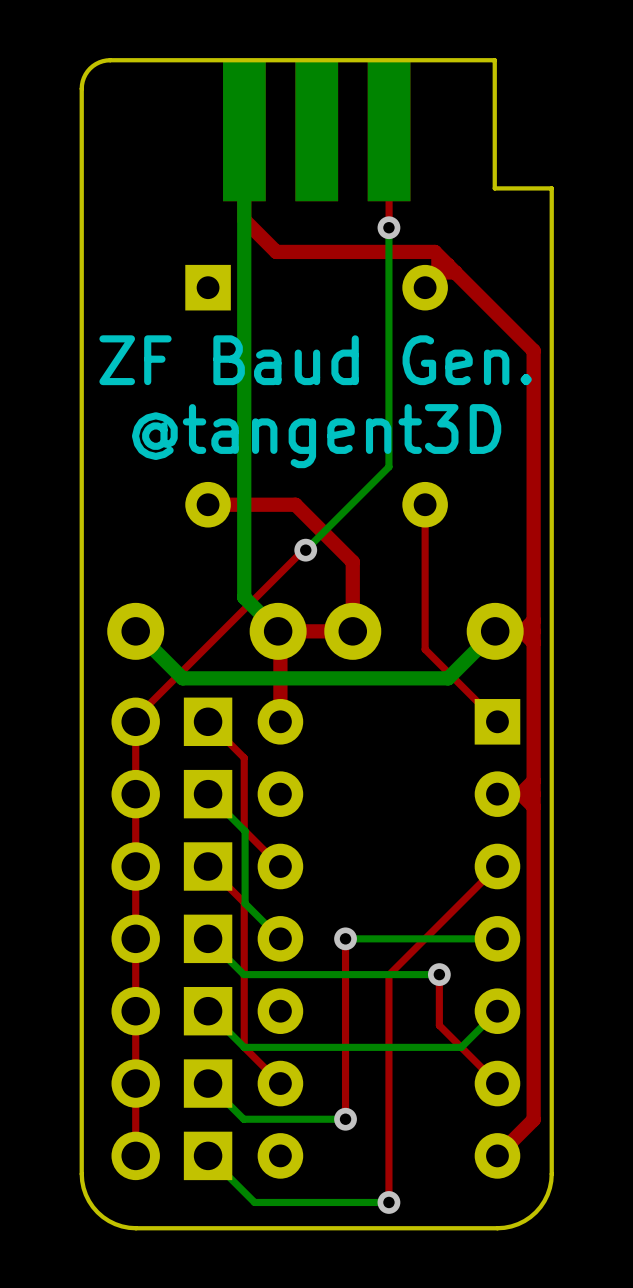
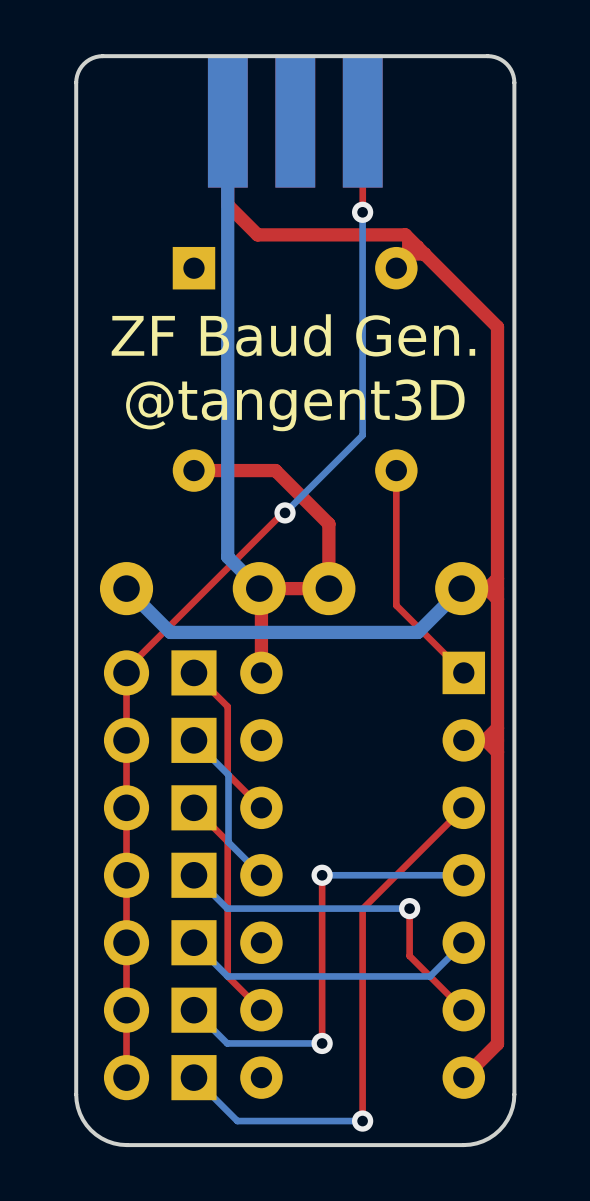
board edge: (494, 60) (494, 188) (551, 188) -> (461, 56) (494, 57) (506, 63) (512, 72) (514, 82) (514, 175)

